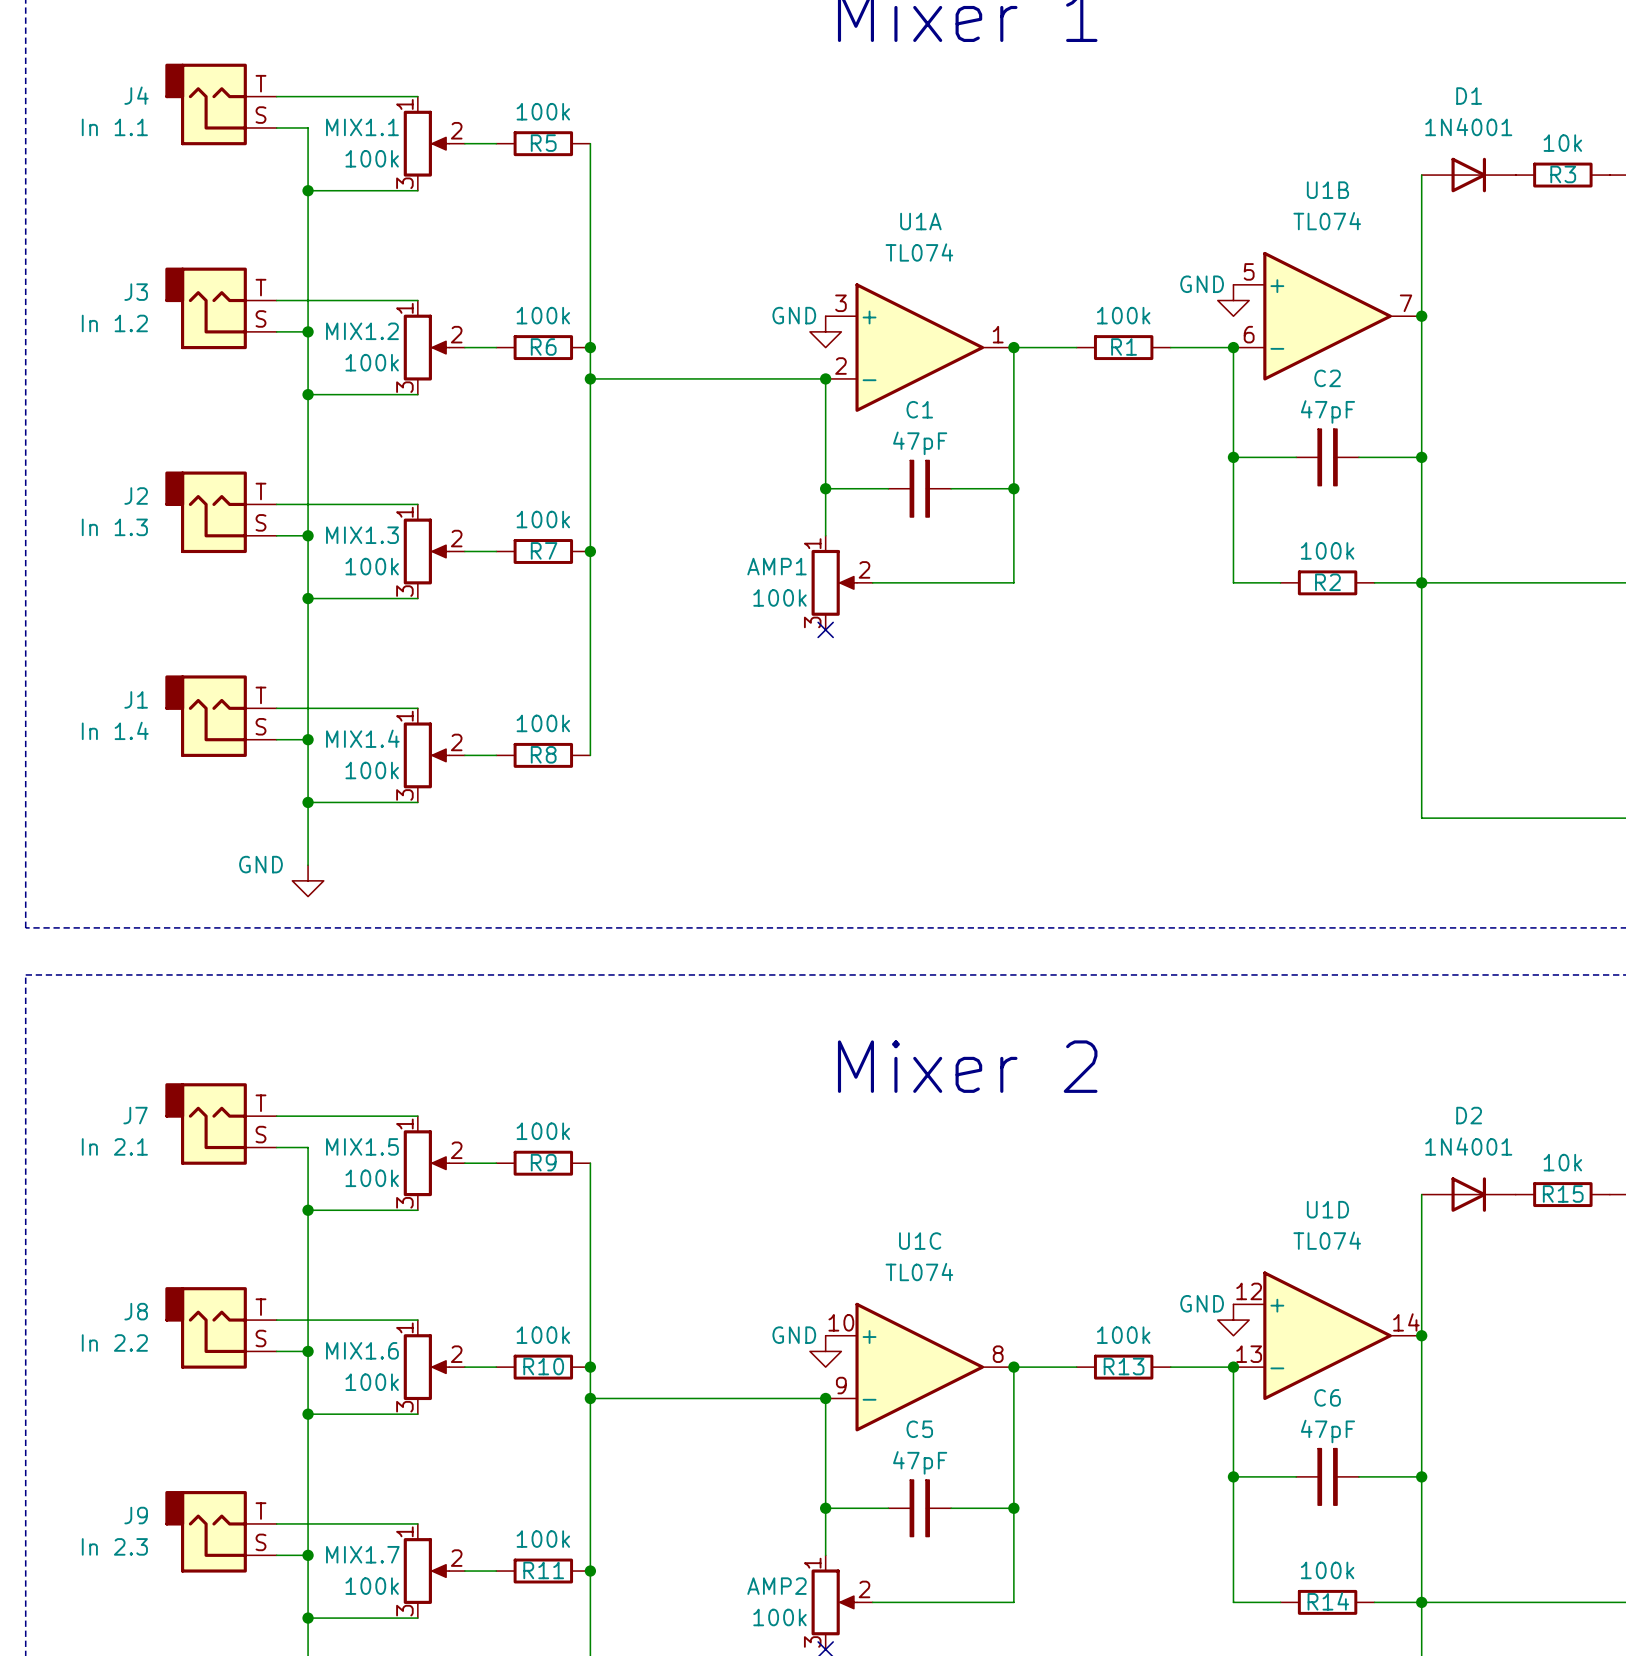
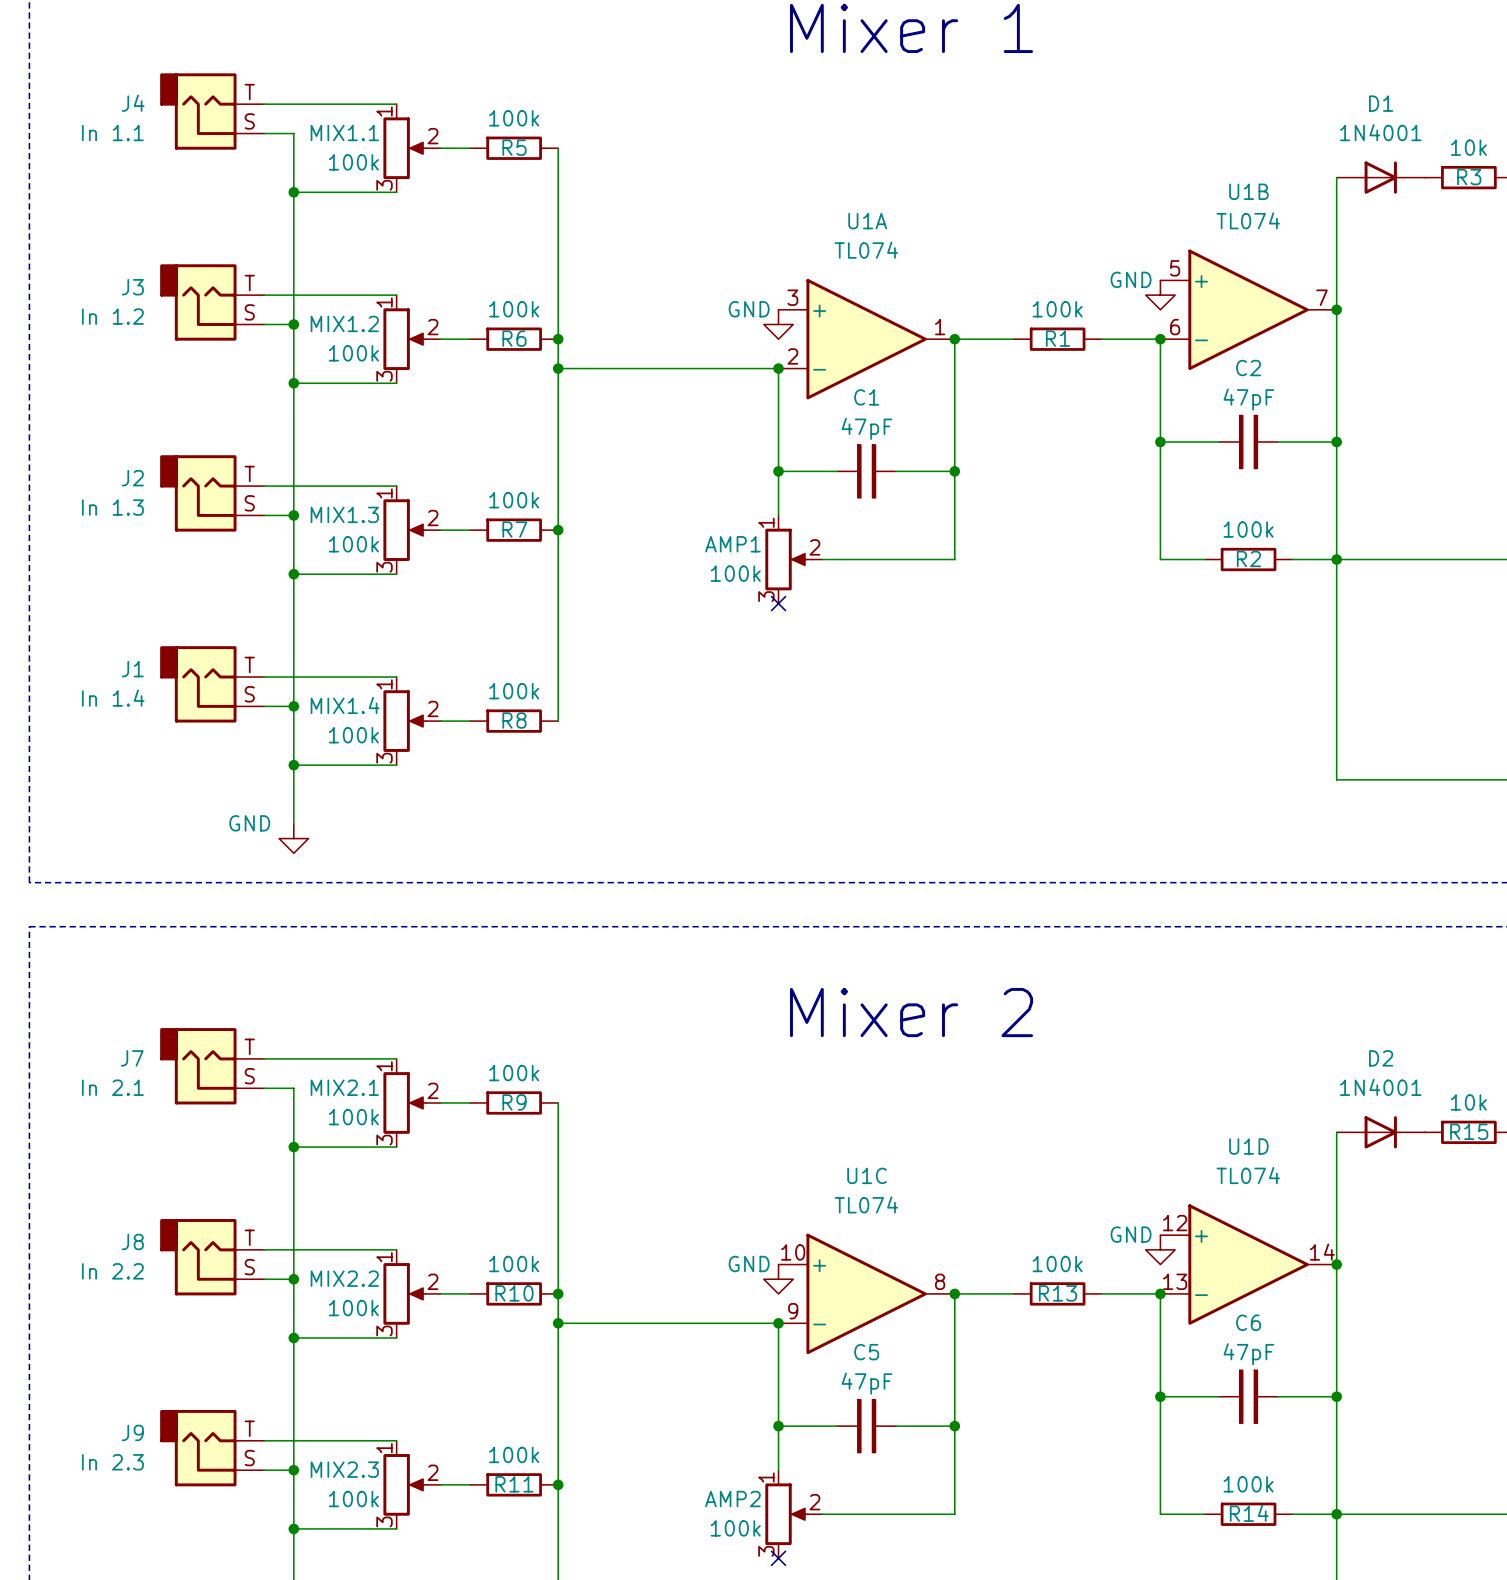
MIX1.5 name: MIX1.5 (362, 1146) -> MIX2.1 (344, 1087)
MIX1.6 name: MIX1.6 (362, 1350) -> MIX2.2 (344, 1278)
MIX1.7 name: MIX1.7 (362, 1554) -> MIX2.3 (344, 1469)

